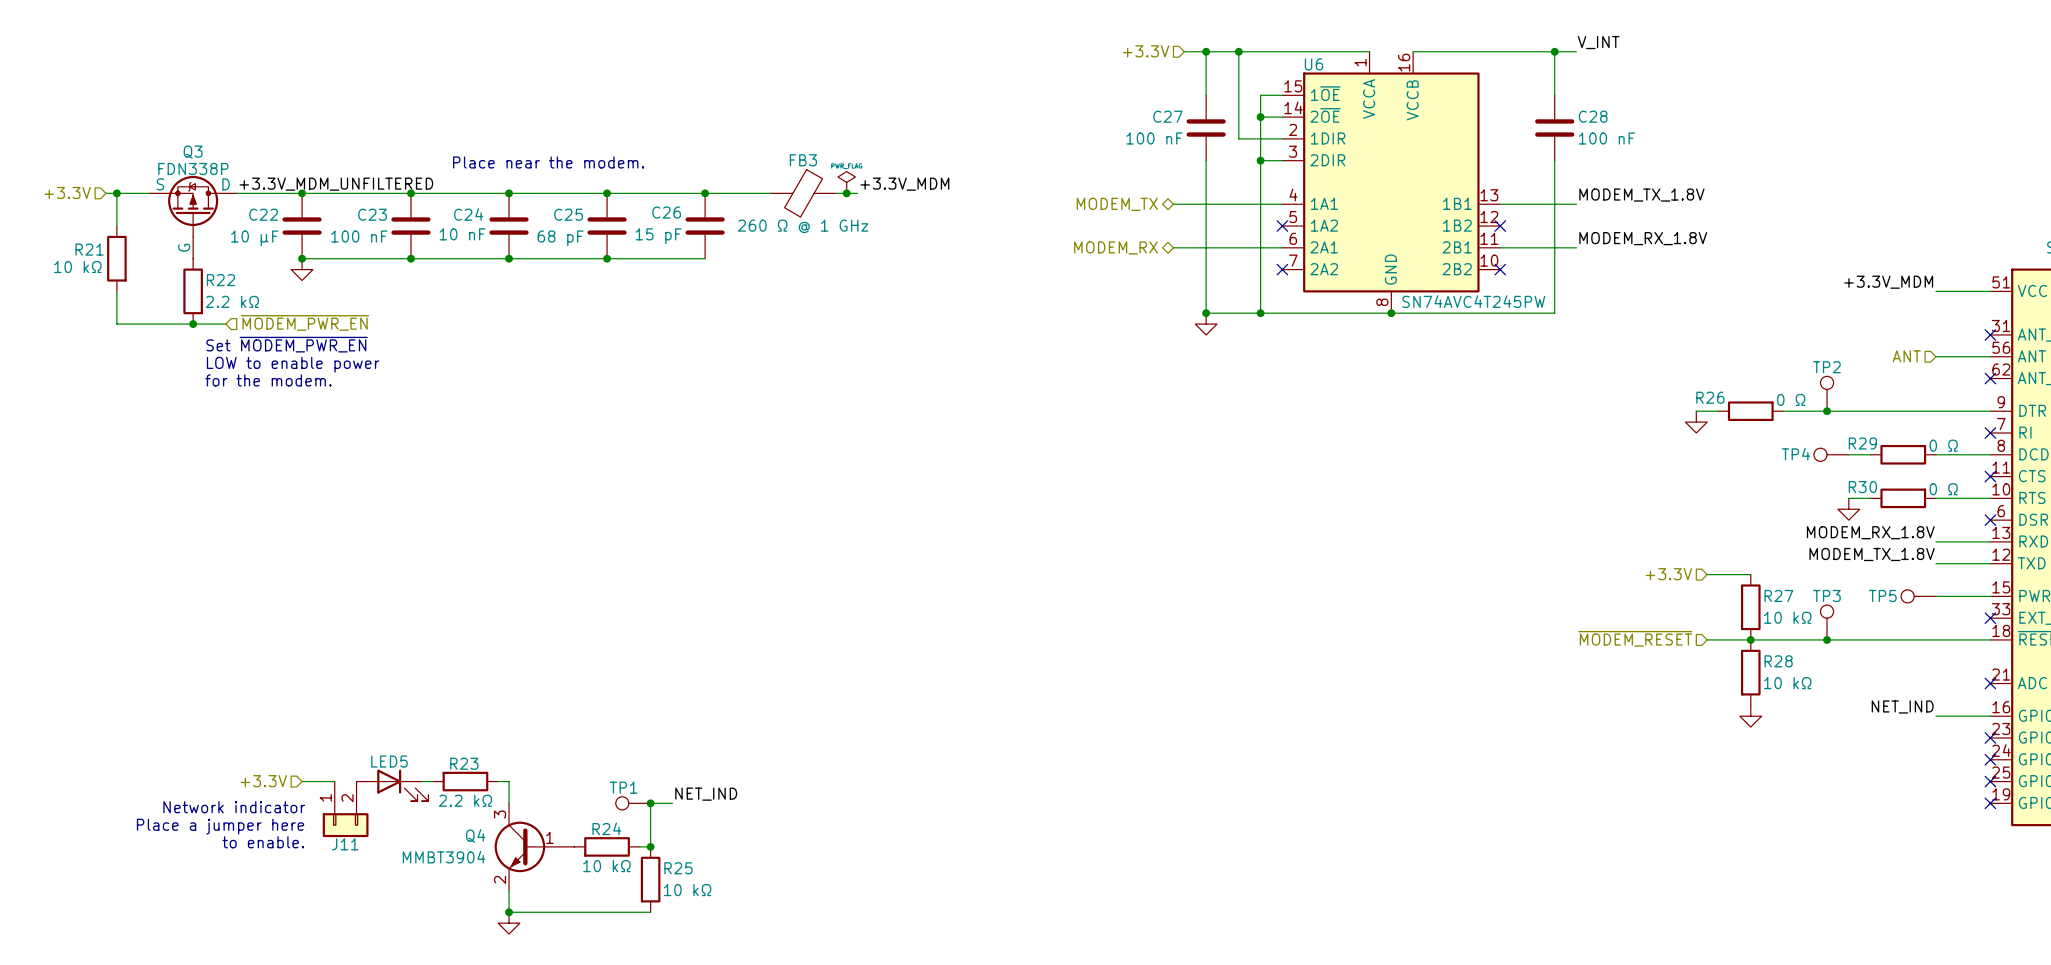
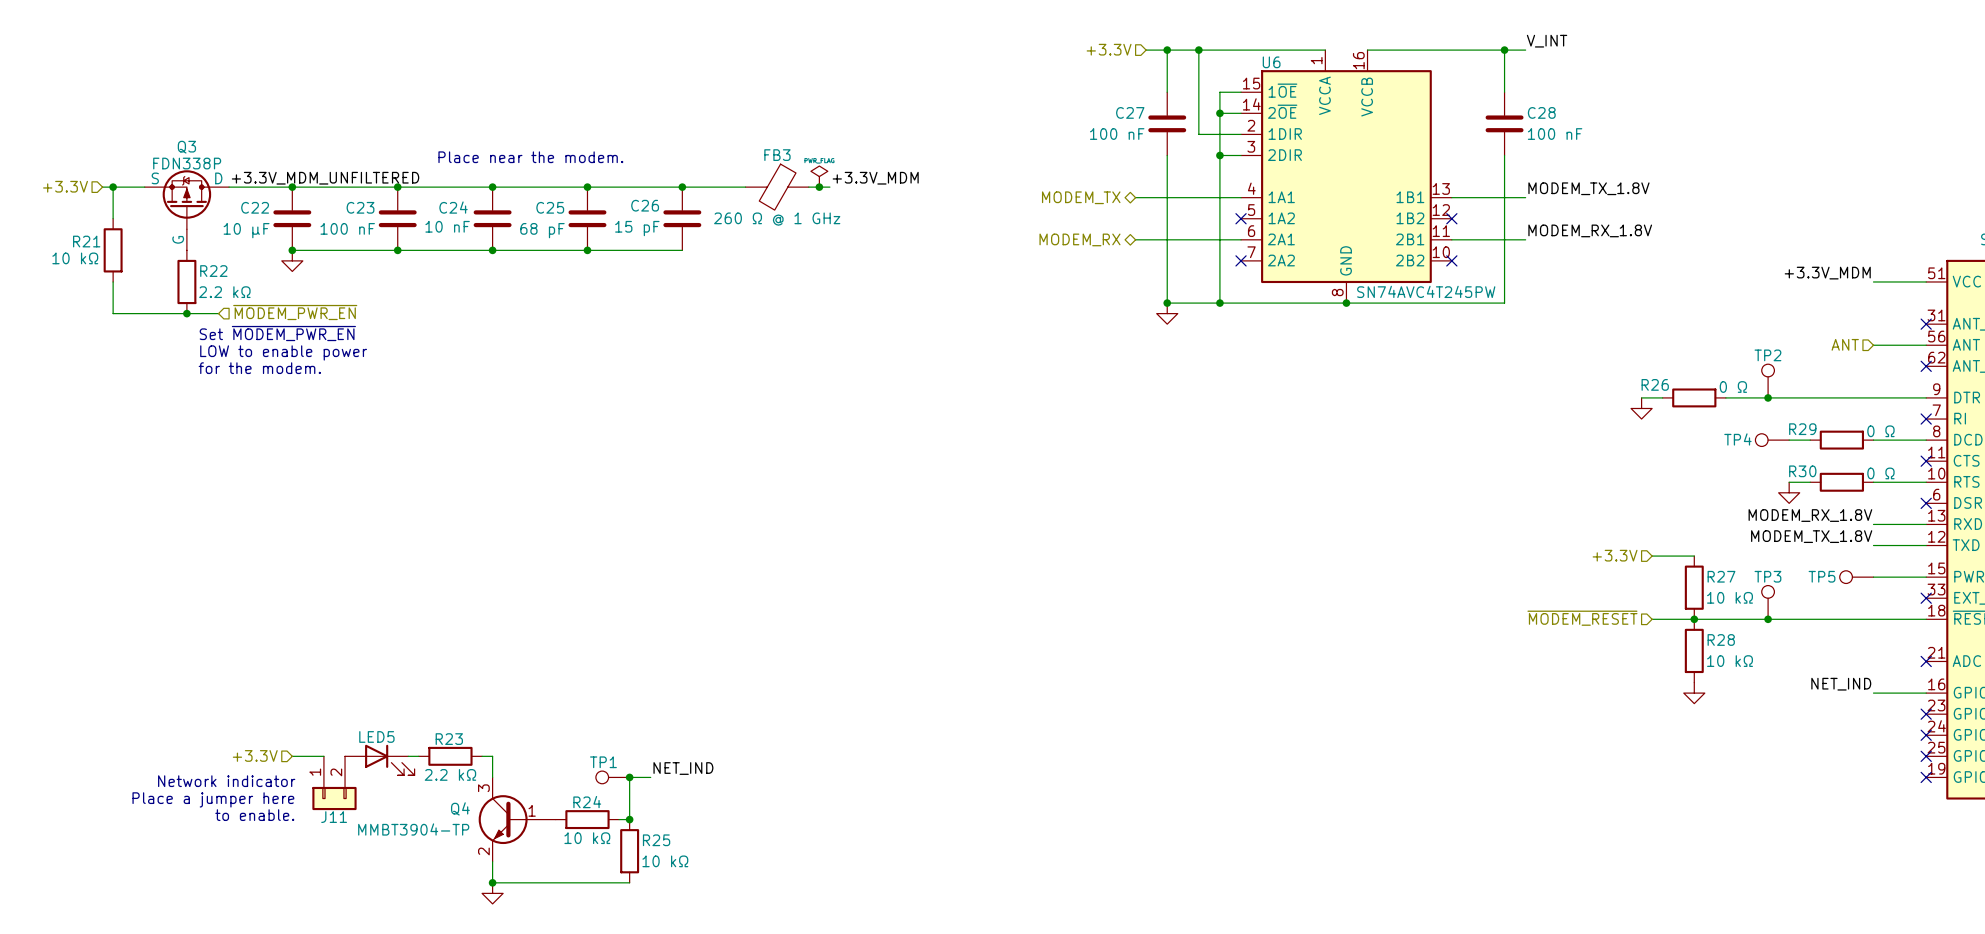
Q4 value: MMBT3904 (444, 857) -> MMBT3904-TP (413, 829)

